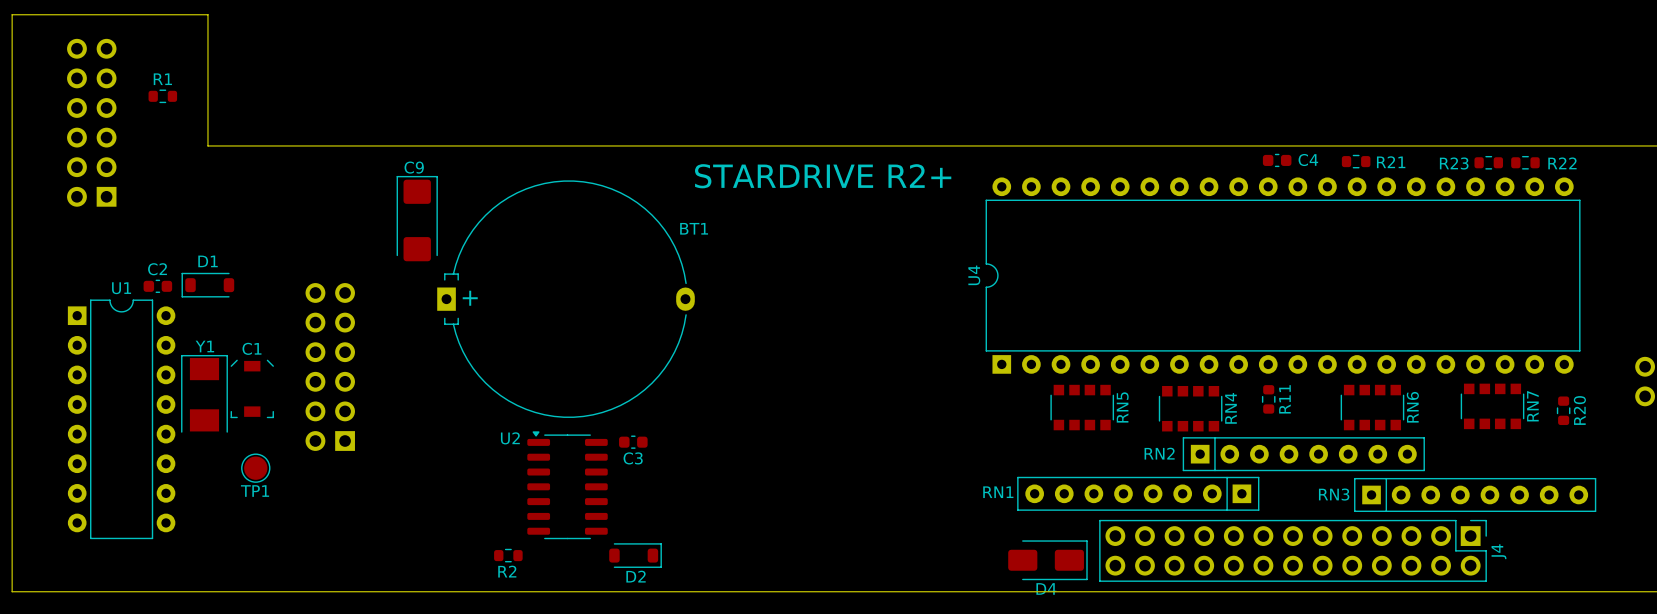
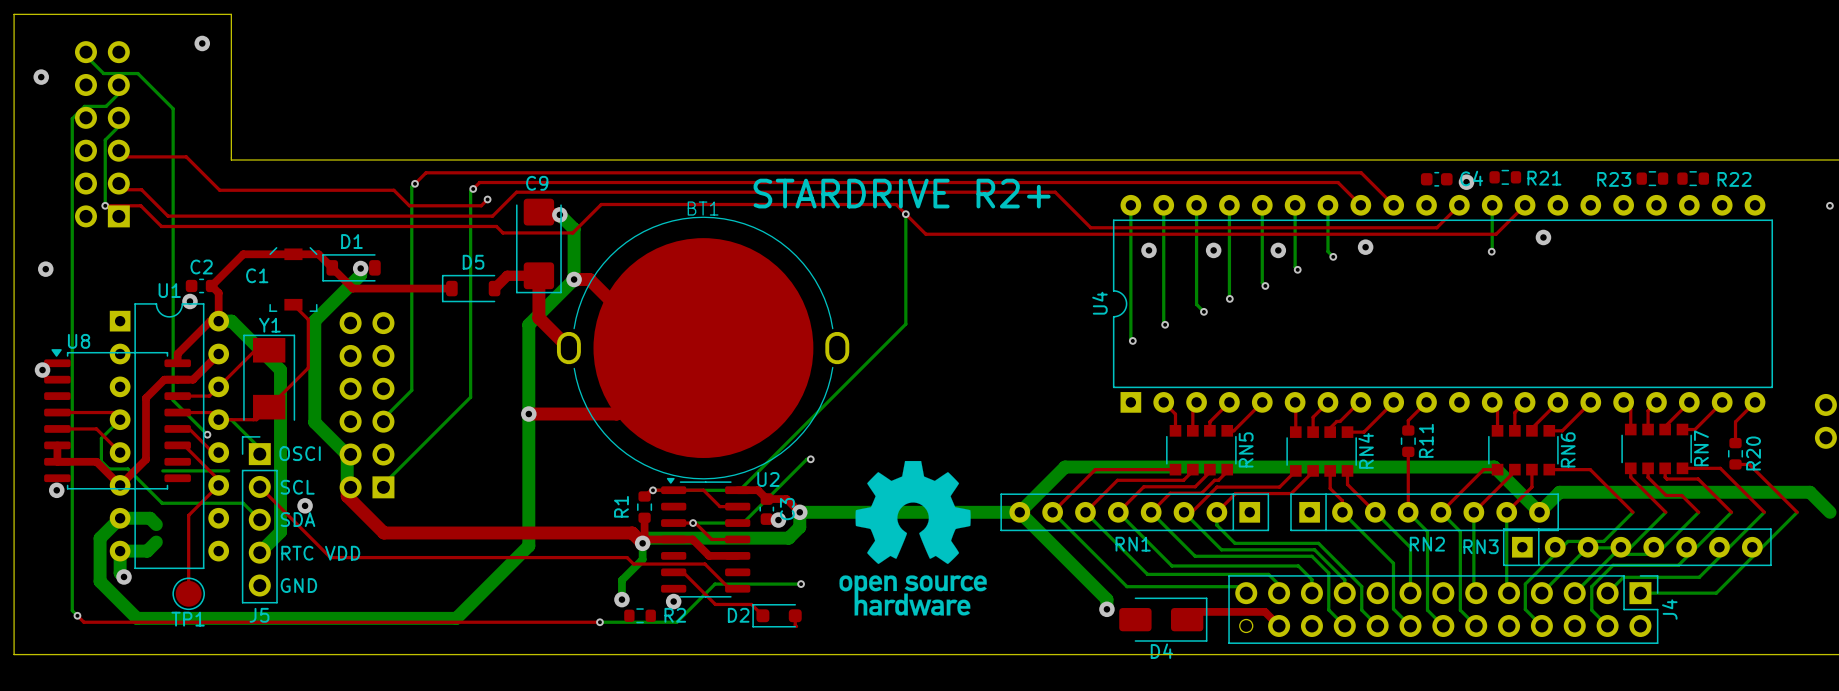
via: none -> (202, 43)
bottom track: none -> (88, 58) (103, 73) (137, 73) (173, 108) (173, 400) (207, 434)
via: none -> (41, 77)
R1 name position: R1 (162, 79) -> R1 (621, 506)
bottom track: none -> (121, 91) (106, 106) (84, 106) (72, 118) (72, 610) (77, 615)
R1 rotation: 0° (162, 96) -> 90° clockwise (644, 507)
R1 position: (162, 96) -> (644, 507)
bottom track: none -> (121, 124) (105, 140) (105, 205)
top track: none -> (121, 156) (186, 156) (219, 190) (393, 190) (409, 205) (481, 205) (487, 199)
C4 position: (1277, 160) -> (1436, 179)
via: none -> (1466, 182)
top track: none -> (415, 183) (426, 172) (1361, 172) (1393, 205)
bottom track: none -> (415, 183) (411, 187) (411, 390) (380, 422)
via: none -> (415, 183)
top track: none -> (121, 189) (141, 189) (167, 216) (492, 216) (516, 192) (1055, 192) (1090, 227) (1436, 227) (1459, 205)
top track: none -> (473, 188) (479, 182) (1338, 182) (1360, 205)
bottom track: none -> (473, 188) (470, 191) (470, 397) (380, 487)
via: none -> (473, 188)
text position: STARDRIVE R2+ (823, 176) -> STARDRIVE R2+ (902, 193)
BT1 footprint: [437, 180, 695, 418] -> [556, 216, 850, 480]
via: none -> (487, 199)
bottom track: none -> (1130, 205) (1130, 339) (1132, 340)
bottom track: none -> (1163, 205) (1165, 324)
bottom track: none -> (1196, 205) (1196, 304) (1203, 311)
bottom track: none -> (1229, 205) (1229, 298)
bottom track: none -> (1262, 205) (1262, 282) (1265, 285)
bottom track: none -> (1295, 205) (1295, 267) (1297, 269)
bottom track: none -> (1327, 205) (1327, 251) (1333, 256)
bottom track: none -> (1492, 205) (1491, 251)
top track: none -> (1525, 205) (1496, 234) (925, 234) (896, 204) (601, 204) (572, 232) (502, 232) (496, 226) (161, 226) (140, 205) (105, 205)
via: none -> (105, 205)
via: none -> (1829, 205)
bottom track: none -> (905, 214) (905, 324) (739, 490) (652, 490)
via: none -> (905, 214)
bottom track: none -> (559, 214) (574, 229) (574, 279) (528, 324) (528, 545) (456, 618) (136, 618) (100, 581) (100, 538) (120, 518) (150, 518) (156, 524)
via: none -> (559, 214)
via: none -> (1543, 237)
C9 rotation: 0° (417, 218) -> 180° (538, 246)
C9 position: (417, 218) -> (538, 246)
via: none -> (1365, 247)
via: none -> (1148, 250)
via: none -> (1213, 250)
via: none -> (1278, 250)
BT1 name position: BT1 (694, 228) -> BT1 (703, 208)
via: none -> (1491, 251)
via: none -> (1333, 256)
bottom track: none -> (360, 268) (360, 274) (314, 320) (314, 422) (347, 454) (347, 487)
via: none -> (360, 268)
via: none -> (45, 269)
via: none -> (1297, 269)
top track: none -> (574, 279) (589, 279) (624, 314)
via: none -> (574, 279)
via: none -> (1265, 285)
top track: none -> (451, 288) (352, 288) (318, 254) (243, 254) (211, 285) (218, 293) (218, 321) (210, 321) (177, 353) (177, 363)
D5: none -> (471, 288)
top track: none -> (494, 288) (507, 275) (538, 275) (538, 318) (568, 348)
via: none -> (1229, 298)
via: none -> (189, 301)
U4 position: (1283, 275) -> (1442, 303)
top track: none -> (293, 304) (308, 319) (308, 368) (256, 419) (218, 419) (211, 412) (177, 412)
via: none -> (1203, 311)
D1 position: (207, 285) -> (351, 267)
C2 position: (157, 286) -> (201, 285)
bottom track: none -> (218, 321) (231, 321) (280, 370) (280, 531) (259, 552)
via: none -> (1165, 324)
via: none -> (1132, 340)
top track: none -> (255, 350) (209, 396) (177, 396)
top track: none -> (680, 350) (616, 414) (528, 414)
top track: none -> (218, 354) (193, 379) (164, 379) (146, 398) (146, 459) (120, 485) (96, 461) (57, 461) (57, 445)
via: none -> (42, 370)
C1 name position: C1 (251, 348) -> C1 (257, 275)
top track: none -> (1163, 402) (1175, 414) (1175, 430)
top track: none -> (1229, 402) (1209, 421) (1209, 430)
top track: none -> (1262, 402) (1233, 430) (1227, 430)
top track: none -> (1327, 402) (1313, 417) (1313, 432)
top track: none -> (1359, 402) (1340, 421) (1336, 421) (1330, 428)
top track: none -> (1393, 402) (1363, 432) (1347, 432)
top track: none -> (1426, 402) (1408, 420) (1408, 430)
top track: none -> (1525, 402) (1514, 412) (1514, 430)
top track: none -> (1557, 402) (1531, 428)
top track: none -> (1590, 402) (1562, 430) (1549, 430)
top track: none -> (1623, 402) (1630, 409) (1630, 429)
top track: none -> (1656, 402) (1648, 410) (1648, 429)
top track: none -> (1689, 402) (1665, 426)
top track: none -> (1722, 402) (1695, 429) (1682, 429)
top track: none -> (1755, 402) (1735, 421) (1735, 443)
top track: none -> (1295, 403) (1295, 432)
top track: none -> (1192, 406) (1192, 430)
top track: none -> (1497, 407) (1497, 430)
top track: none -> (57, 412) (112, 412) (120, 419)
via: none -> (528, 414)
U8: none -> (117, 419)
bottom track: none -> (120, 419) (101, 438) (101, 461) (109, 468) (127, 468) (162, 503) (243, 503) (259, 519)
bottom track: none -> (218, 419) (231, 419) (259, 448)
top track: none -> (57, 428) (96, 428) (120, 452)
top track: none -> (189, 428) (212, 452)
C1 position: (252, 388) -> (293, 279)
via: none -> (207, 434)
Y1 position: (204, 393) -> (269, 377)
top track: none -> (184, 445) (218, 479)
top track: none -> (1408, 451) (1408, 512)
text: none -> OSCI (300, 453)
bottom track: none -> (810, 459) (806, 459) (743, 523) (693, 523)
via: none -> (810, 459)
drawing: none -> [839, 460, 987, 616]
U1 position: (121, 419) -> (169, 436)
top track: none -> (1735, 464) (1749, 464) (1797, 512)
top track: none -> (1630, 468) (1630, 477) (1665, 512)
top track: none -> (1648, 468) (1648, 477) (1666, 495) (1681, 495) (1698, 512)
top track: none -> (1665, 468) (1666, 479) (1698, 479) (1731, 512)
top track: none -> (1682, 468) (1720, 468) (1764, 512)
top track: none -> (1175, 469) (1095, 469) (1052, 512)
top track: none -> (1497, 469) (1483, 469) (1441, 512)
top track: none -> (1531, 469) (1531, 487) (1506, 512)
top track: none -> (1549, 469) (1590, 469) (1632, 512)
bottom track: none -> (162, 470) (228, 470)
top track: none -> (1192, 471) (1183, 480) (1117, 480) (1085, 512)
top track: none -> (1227, 471) (1201, 493) (1170, 493) (1151, 512)
top track: none -> (1295, 470) (1279, 487) (1216, 487) (1191, 512)
top track: none -> (1313, 471) (1291, 493) (1235, 493) (1216, 512)
top track: none -> (1330, 470) (1330, 488) (1342, 500) (1342, 512)
top track: none -> (1347, 470) (1347, 484) (1375, 512)
top track: none -> (1514, 471) (1473, 512)
top track: none -> (1209, 472) (1195, 486) (1143, 486) (1118, 512)
U2 name position: U2 (510, 438) -> U2 (768, 479)
top track: none -> (218, 485) (188, 515) (188, 593)
top track: none -> (259, 486) (330, 557) (627, 557) (633, 564) (704, 564) (729, 588)
text: none -> SCL (297, 487)
top track: none -> (347, 487) (347, 496) (383, 533) (632, 533) (642, 543)
C3 rotation: 0° (633, 442) -> 90° clockwise (766, 509)
C3 position: (633, 442) -> (766, 509)
via: none -> (56, 490)
via: none -> (652, 490)
top track: none -> (737, 490) (757, 490) (766, 499) (786, 499) (799, 512)
top track: none -> (644, 496) (650, 490) (703, 490) (719, 506) (737, 506)
RN2 name position: RN2 (1159, 453) -> RN2 (1427, 544)
RN2 position: (1303, 454) -> (1424, 512)
via: none -> (305, 505)
C3 name position: C3 (633, 458) -> C3 (787, 509)
via: none -> (799, 512)
bottom track: none -> (1019, 512) (1065, 467) (1494, 467) (1539, 512) (1559, 492) (1810, 492) (1830, 512)
bottom track: none -> (1019, 512) (799, 512) (799, 527) (788, 538) (647, 538) (642, 543) (642, 559) (621, 580) (621, 599)
bottom track: none -> (1019, 512) (1106, 599) (1106, 609)
bottom track: none -> (1052, 512) (1126, 586) (1239, 586)
bottom track: none -> (1085, 512) (1147, 574) (1268, 574) (1279, 584)
bottom track: none -> (1118, 512) (1172, 565) (1298, 565) (1311, 579) (1311, 593)
bottom track: none -> (1151, 512) (1195, 556) (1311, 556) (1328, 573) (1328, 609) (1344, 625)
bottom track: none -> (1184, 512) (1221, 549) (1314, 549) (1344, 579) (1344, 593)
bottom track: none -> (1216, 512) (1216, 525) (1234, 543) (1318, 543) (1361, 586) (1361, 610) (1377, 625)
bottom track: none -> (1342, 512) (1393, 563) (1393, 608) (1410, 625)
bottom track: none -> (1375, 512) (1410, 547) (1410, 593)
bottom track: none -> (1408, 512) (1427, 531) (1427, 610) (1443, 625)
bottom track: none -> (1441, 512) (1460, 531) (1460, 610) (1476, 625)
bottom track: none -> (1473, 512) (1473, 590)
bottom track: none -> (1506, 512) (1506, 590)
bottom track: none -> (1632, 512) (1603, 541) (1568, 541) (1525, 584) (1525, 609) (1541, 625)
bottom track: none -> (1665, 512) (1630, 547) (1587, 547) (1541, 593)
bottom track: none -> (1698, 512) (1656, 554) (1613, 554) (1574, 593)
bottom track: none -> (1731, 512) (1678, 565) (1613, 565) (1591, 586) (1591, 610) (1607, 625)
bottom track: none -> (1764, 512) (1699, 577) (1623, 577) (1607, 593)
bottom track: none -> (1797, 512) (1716, 593) (1640, 593)
TP1 position: (255, 468) -> (188, 593)
top track: none -> (644, 517) (644, 541) (646, 539) (692, 539) (709, 555) (737, 555)
J5: none -> (259, 519)
text: none -> SDA (297, 519)
via: none -> (778, 520)
top track: none -> (673, 523) (695, 523) (711, 539) (737, 539)
via: none -> (693, 523)
U2 position: (567, 485) -> (705, 537)
bottom track: none -> (156, 542) (147, 551) (120, 551) (120, 573) (124, 576)
via: none -> (642, 543)
RN1 name position: RN1 (998, 492) -> RN1 (1133, 544)
RN1 position: (1138, 493) -> (1134, 512)
text: none -> RTC VDD (320, 553)
top track: none -> (683, 572) (715, 604) (751, 604) (762, 615)
J4 footprint: [1099, 519, 1487, 582] -> [1228, 575, 1659, 644]
via: none -> (124, 576)
bottom track: none -> (801, 584) (715, 584) (676, 622) (599, 622)
via: none -> (801, 584)
text: none -> GND (298, 585)
via: none -> (621, 599)
via: none -> (673, 601)
D2 footprint: [609, 543, 662, 568] -> [752, 604, 802, 628]
via: none -> (1106, 609)
top track: none -> (1189, 611) (1264, 611) (1279, 625)
R2 position: (508, 555) -> (640, 615)
top track: none -> (77, 615) (83, 622) (599, 622)
via: none -> (77, 615)
top track: none -> (795, 615) (796, 626)
via: none -> (599, 622)
R2 name position: R2 (507, 571) -> R2 (675, 615)
D2 name position: D2 (636, 576) -> D2 (738, 615)

